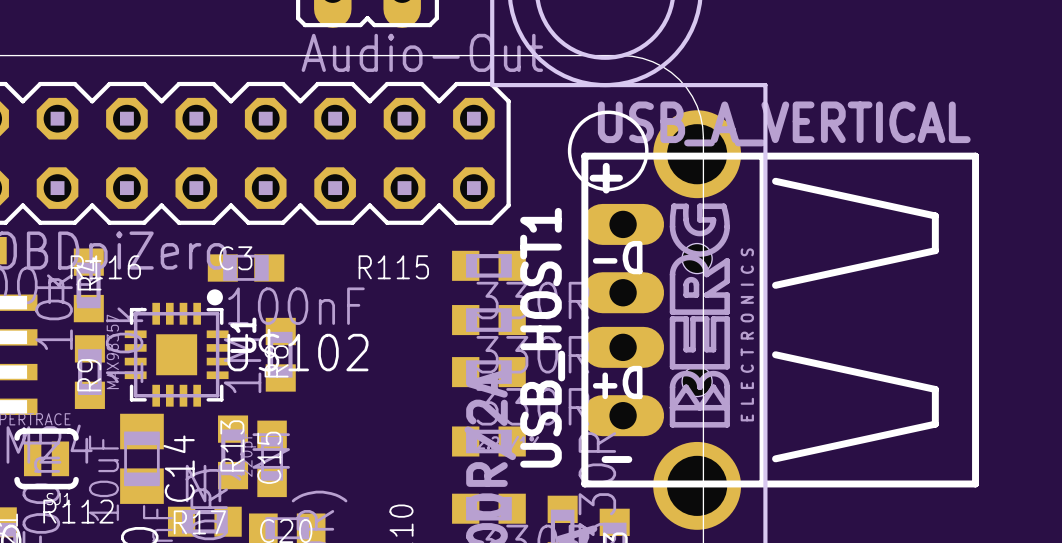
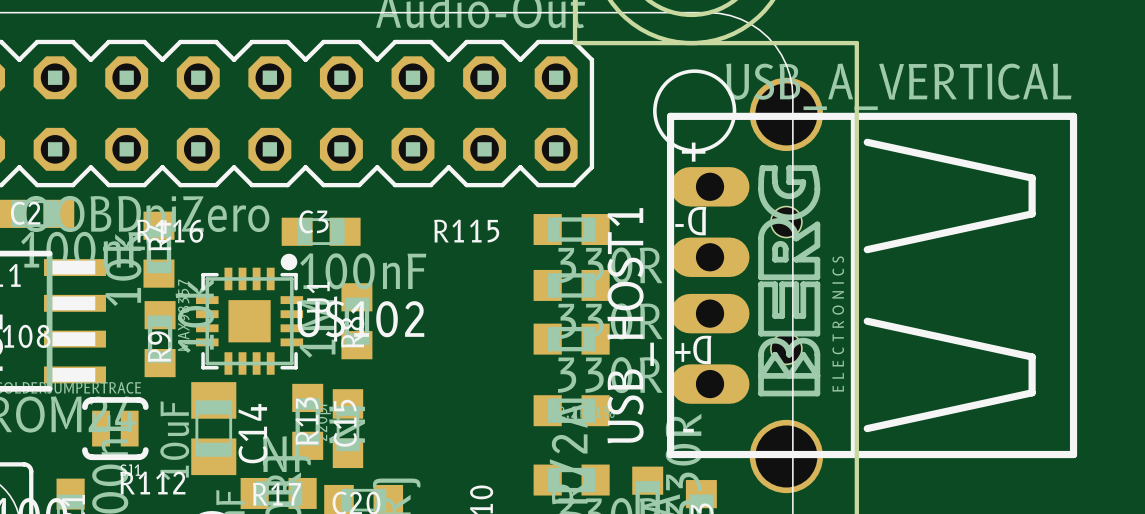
USB_HOST1 footprint: [581, 110, 979, 530] -> [666, 77, 1078, 494]

